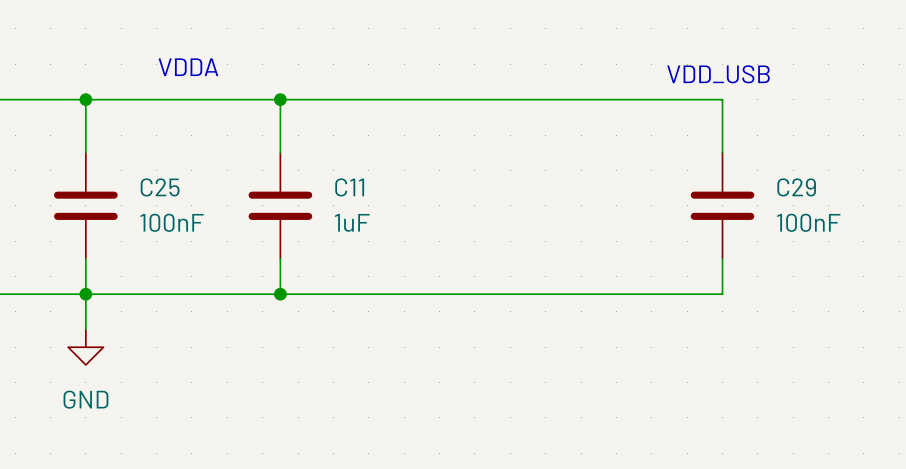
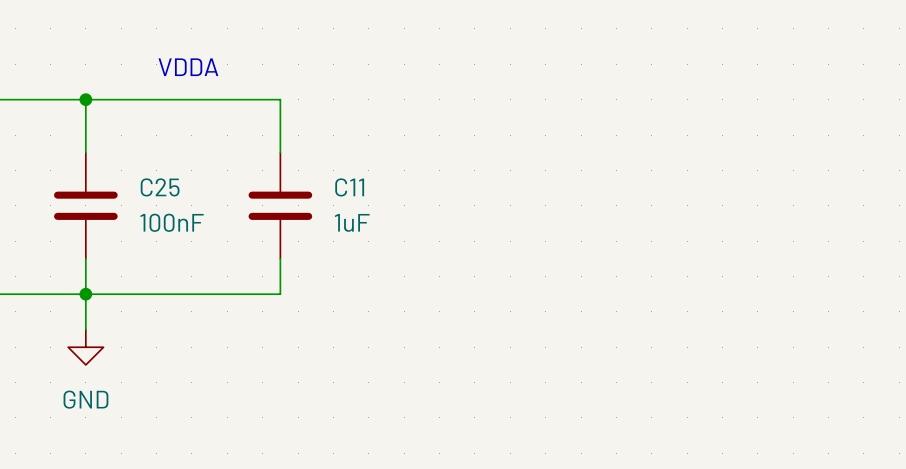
text: VDD_USB (718, 74) -> none
wire: (280, 99) (722, 99) (722, 152) -> none
junction: (280, 99) -> none
C29: 100nF (722, 205) -> none
wire: (722, 258) (722, 294) (280, 294) -> none
junction: (280, 294) -> none

